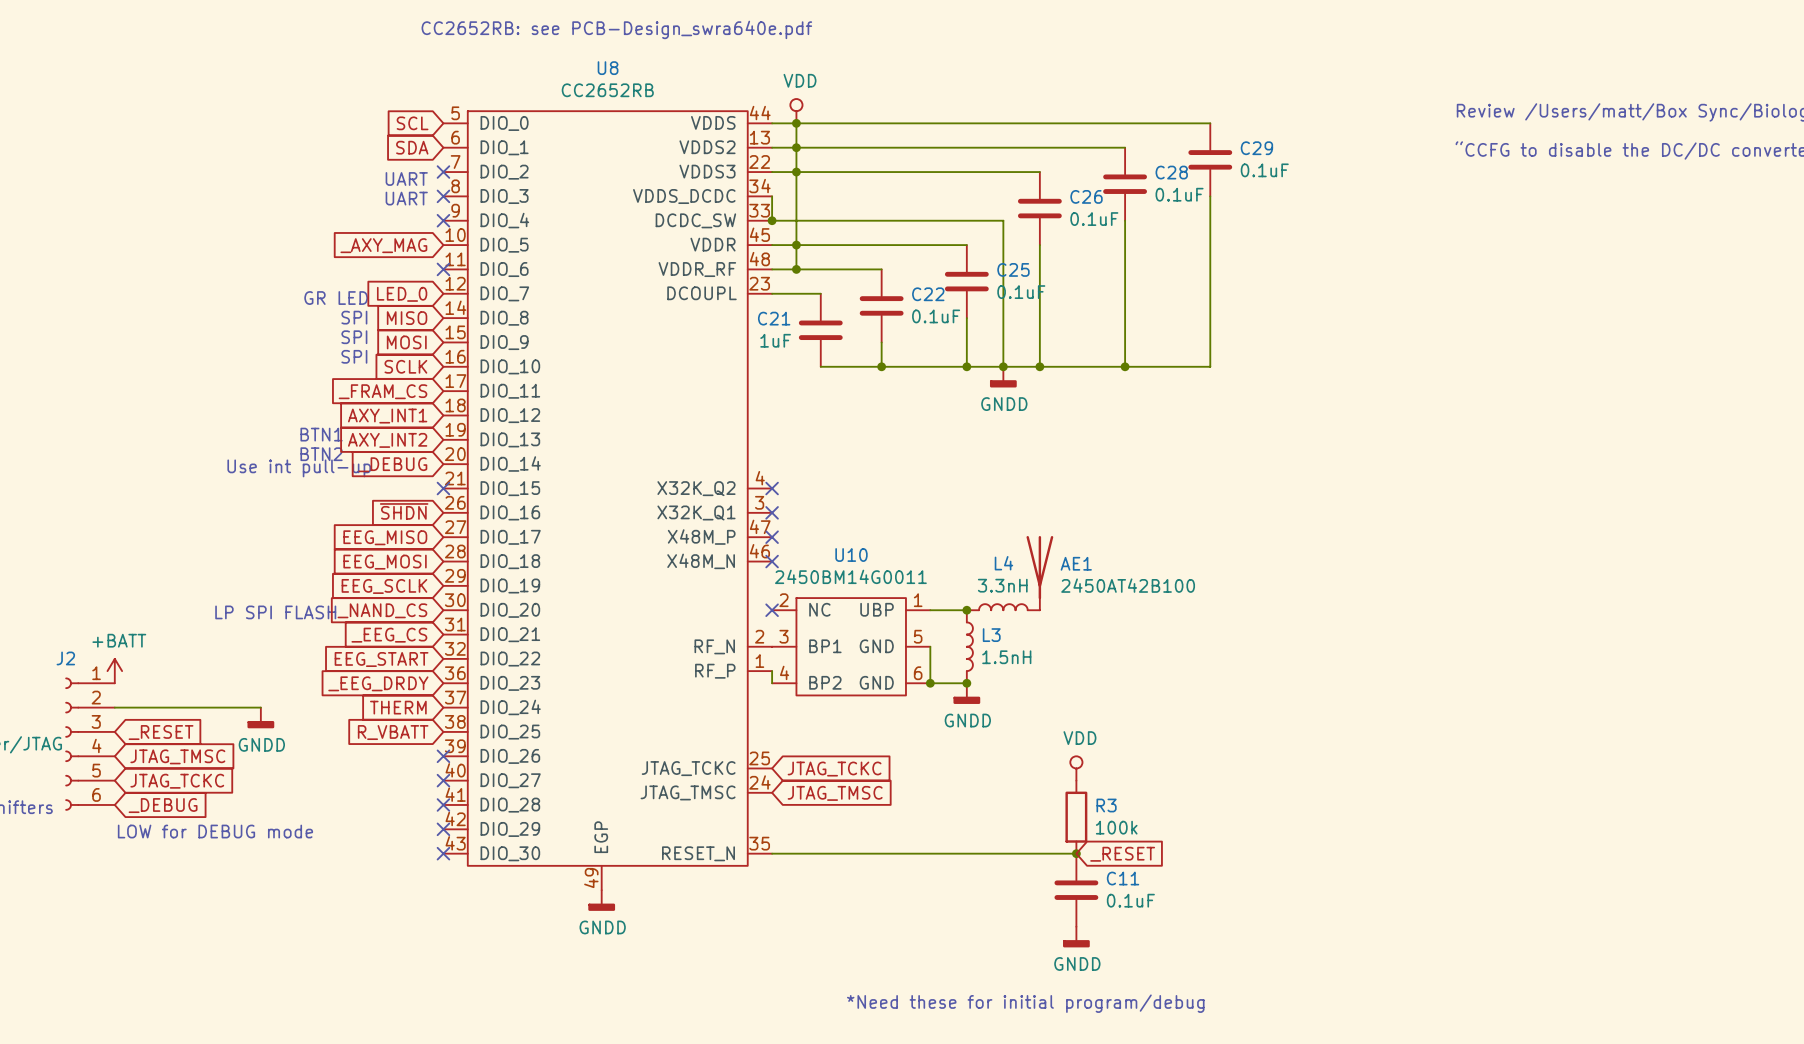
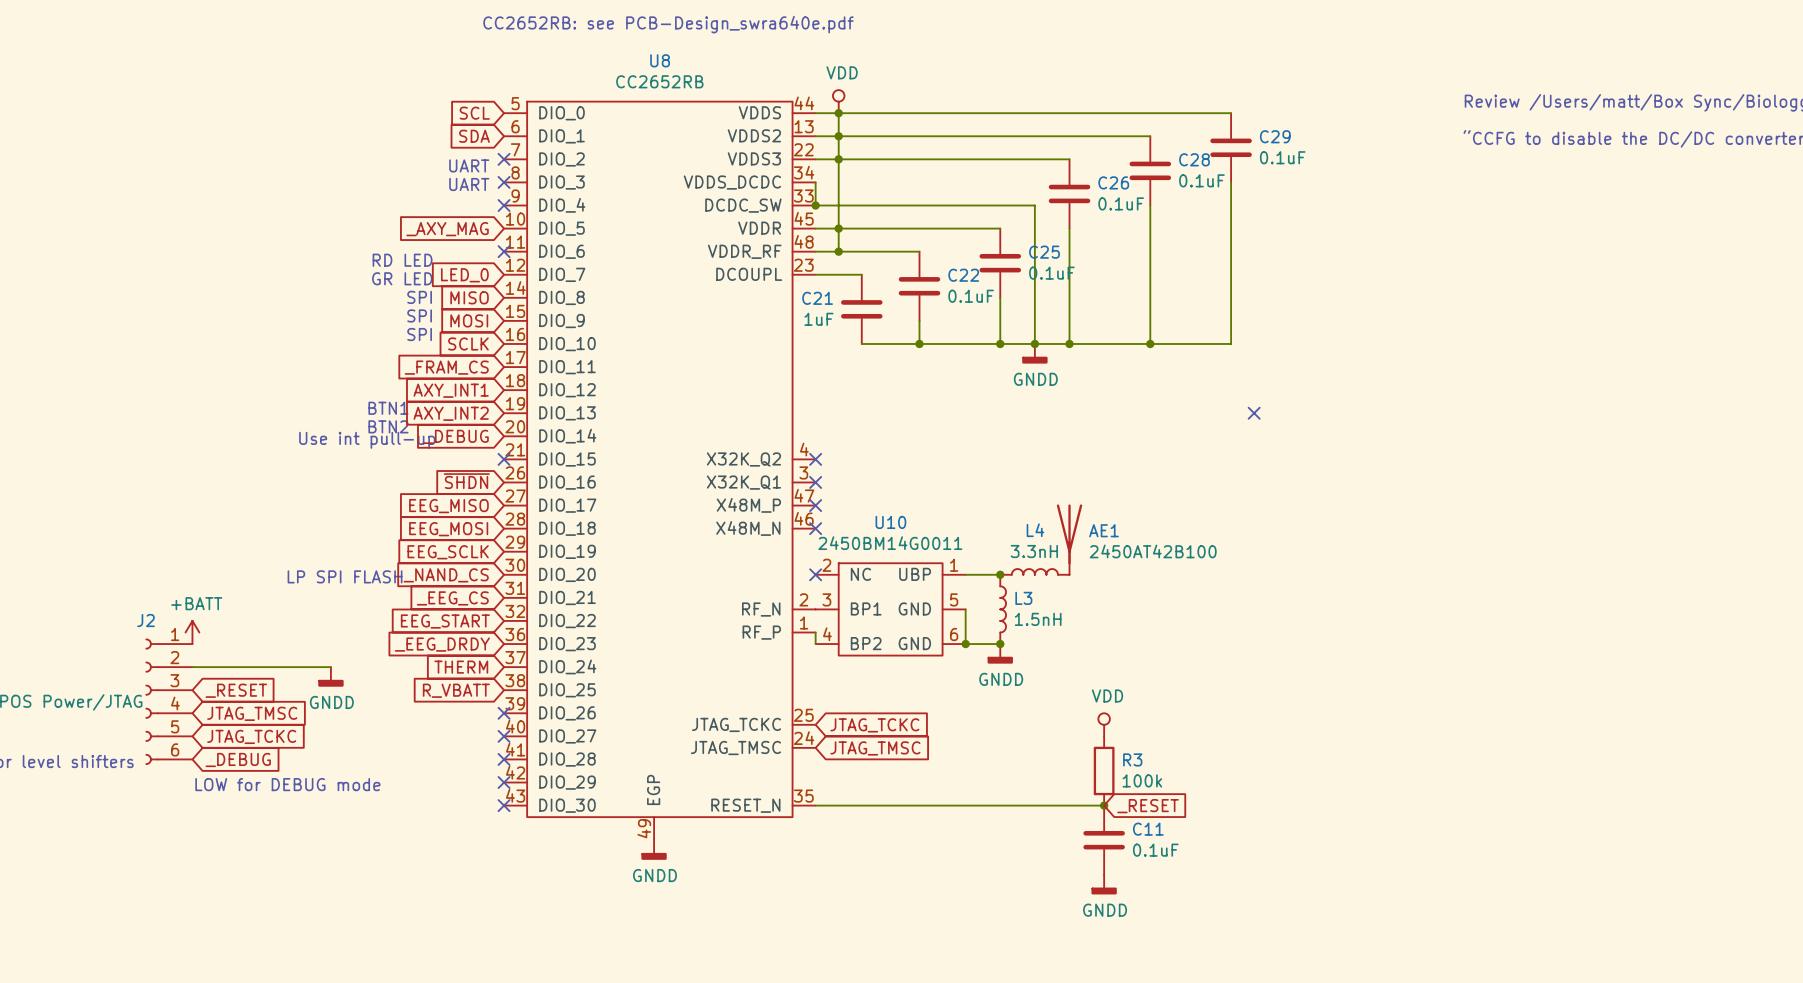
text: none -> RD LED (402, 260)
no-connect mark: none -> (1254, 413)
text: *Need these for initial program/debug (1025, 1003) -> none

